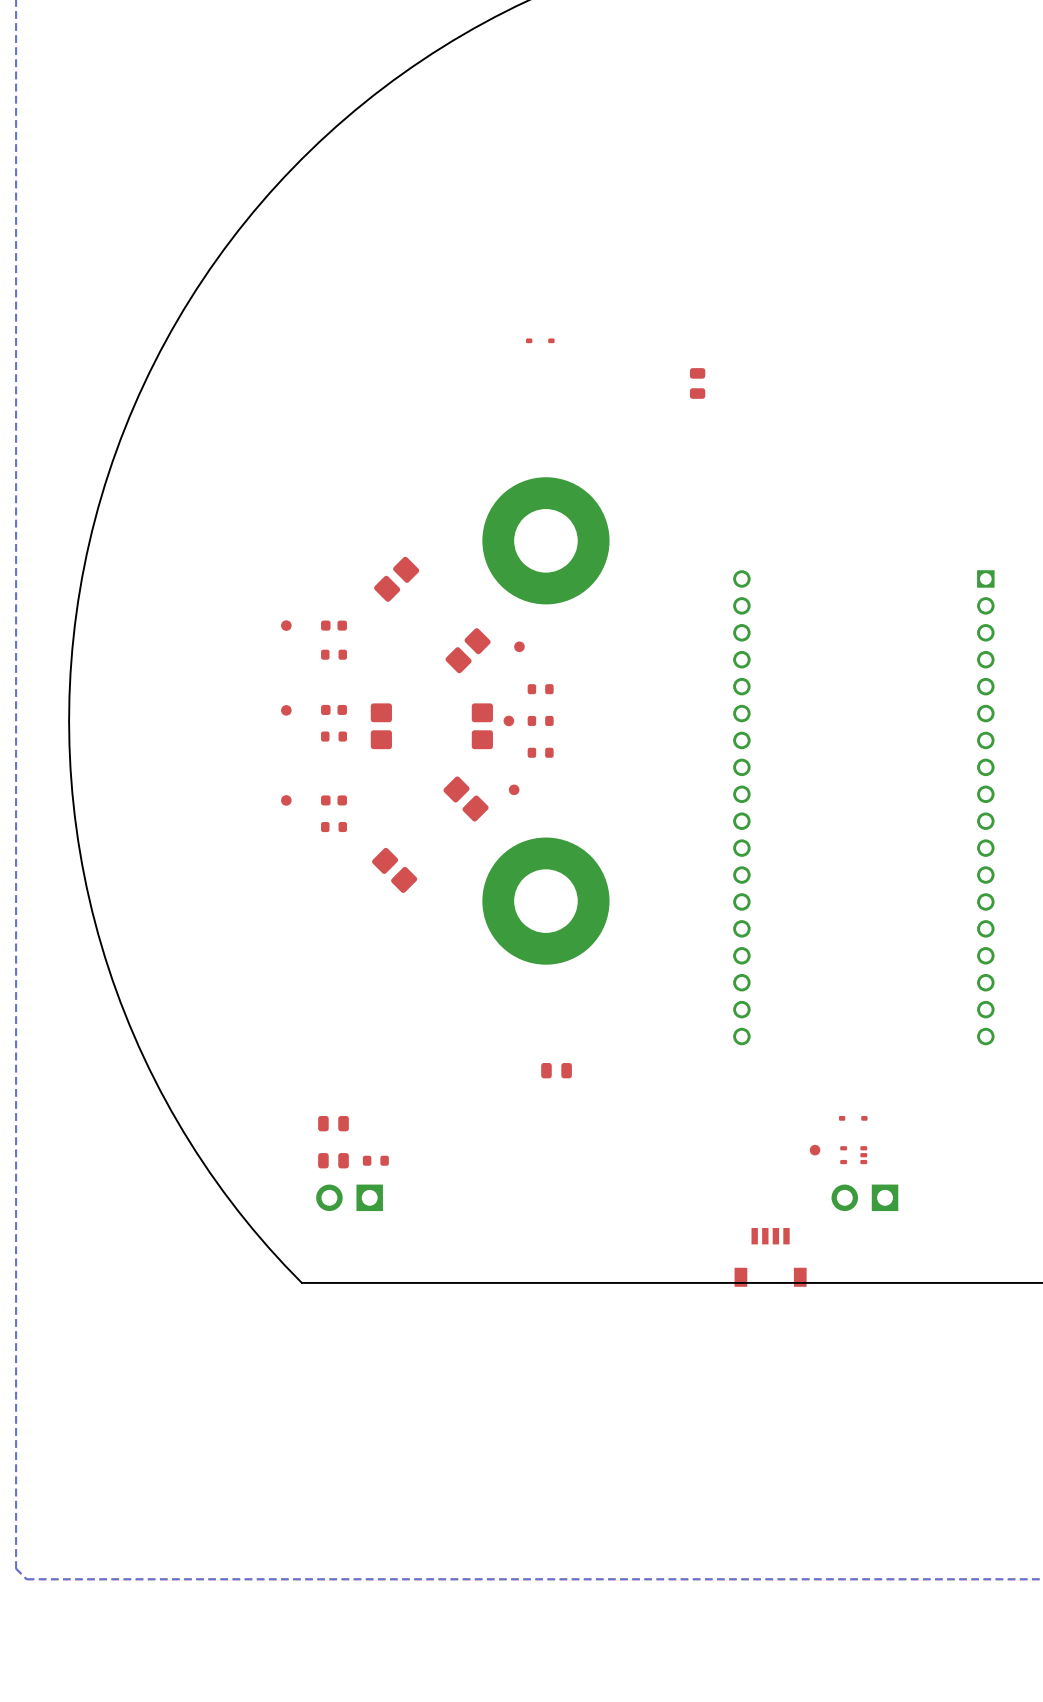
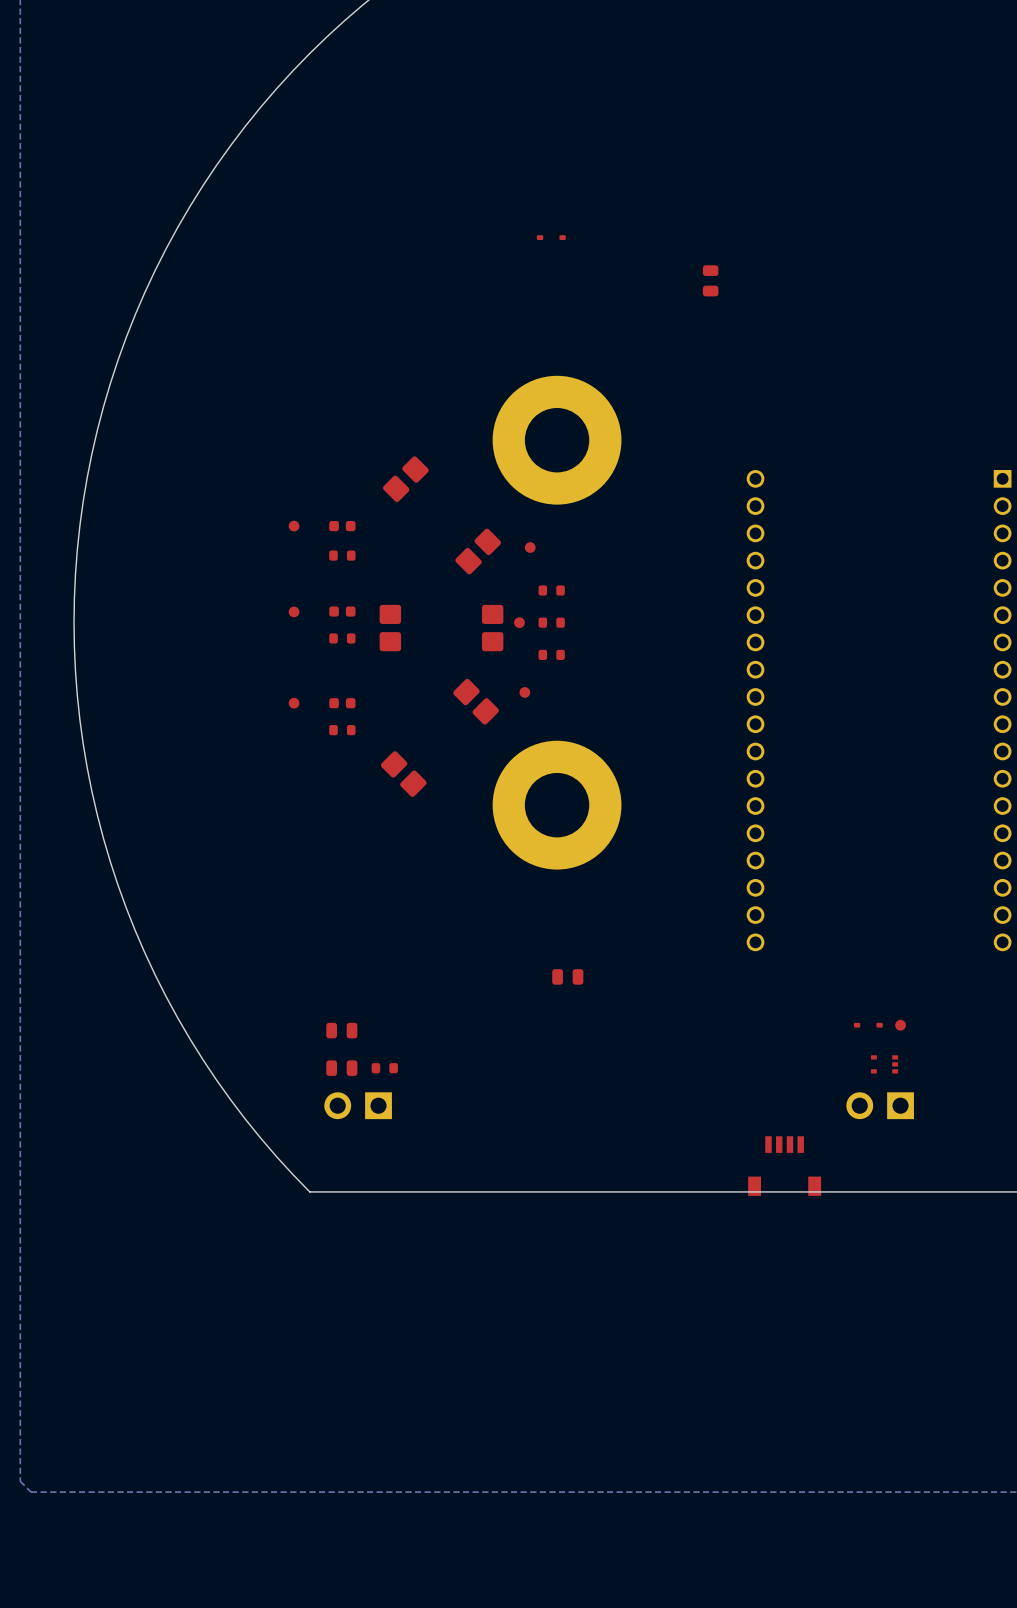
part position: (815, 1150) -> (900, 1025)
part: (853, 1155) -> none
part: none -> (884, 1064)

